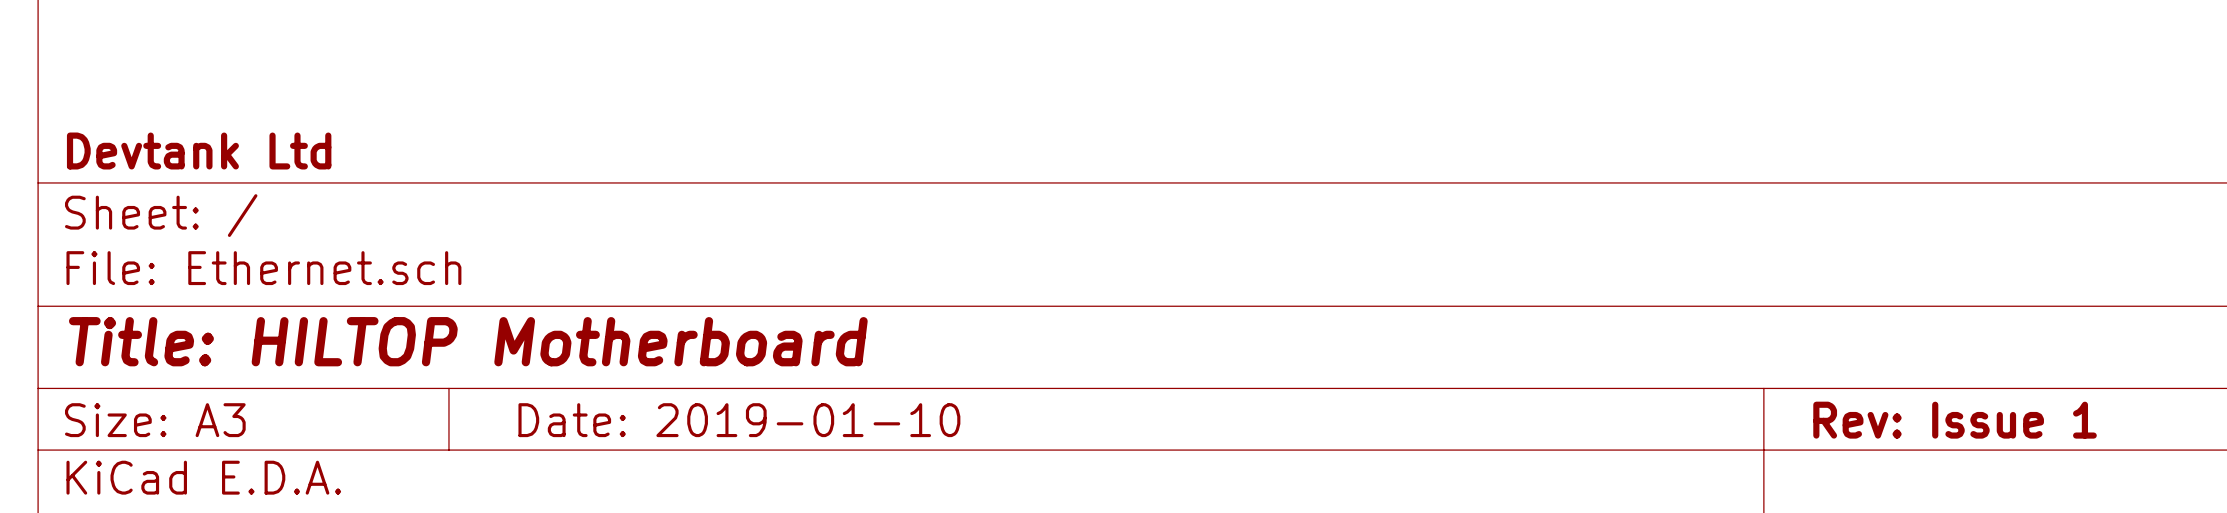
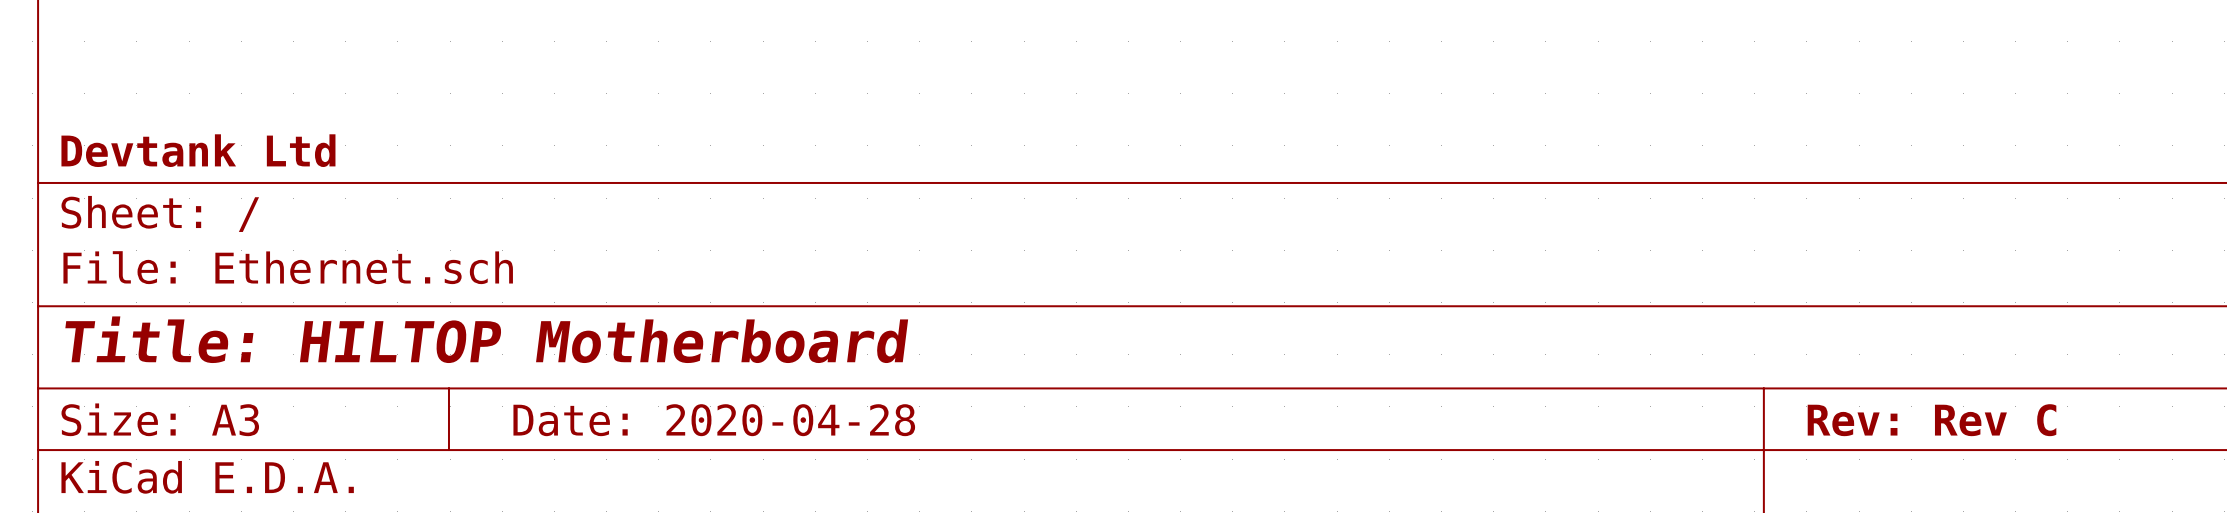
title block: Date: 2019-01-10 (739, 420) -> Date: 2020-04-28 (714, 420)
title block: Rev: Issue 1 (1955, 420) -> Rev: Rev C (1932, 420)

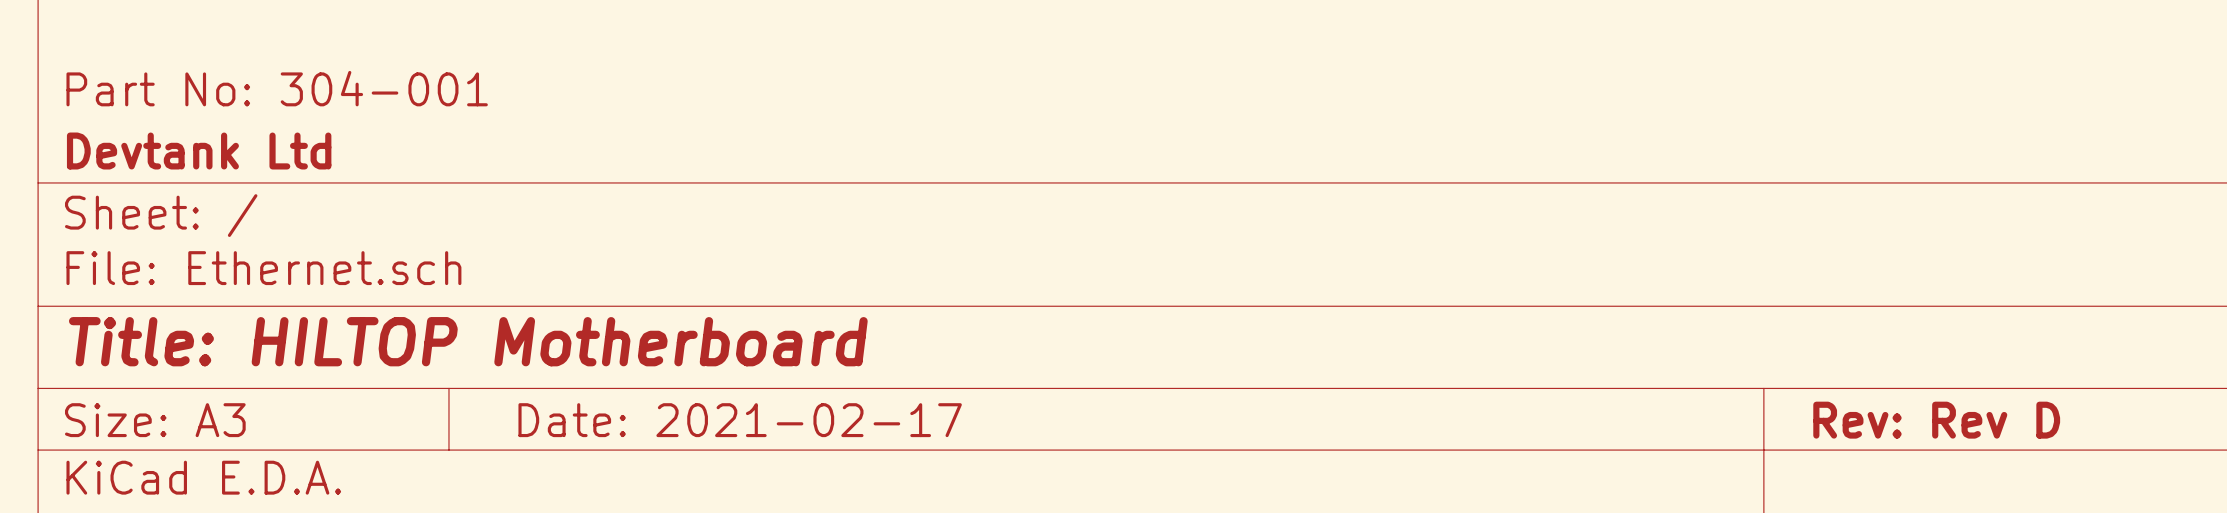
title block: none -> Part No: 304-001 (277, 88)
title block: Date: 2020-04-28 (714, 420) -> Date: 2021-02-17 (740, 420)
title block: Rev: Rev C (1932, 420) -> Rev: Rev D (1936, 420)

